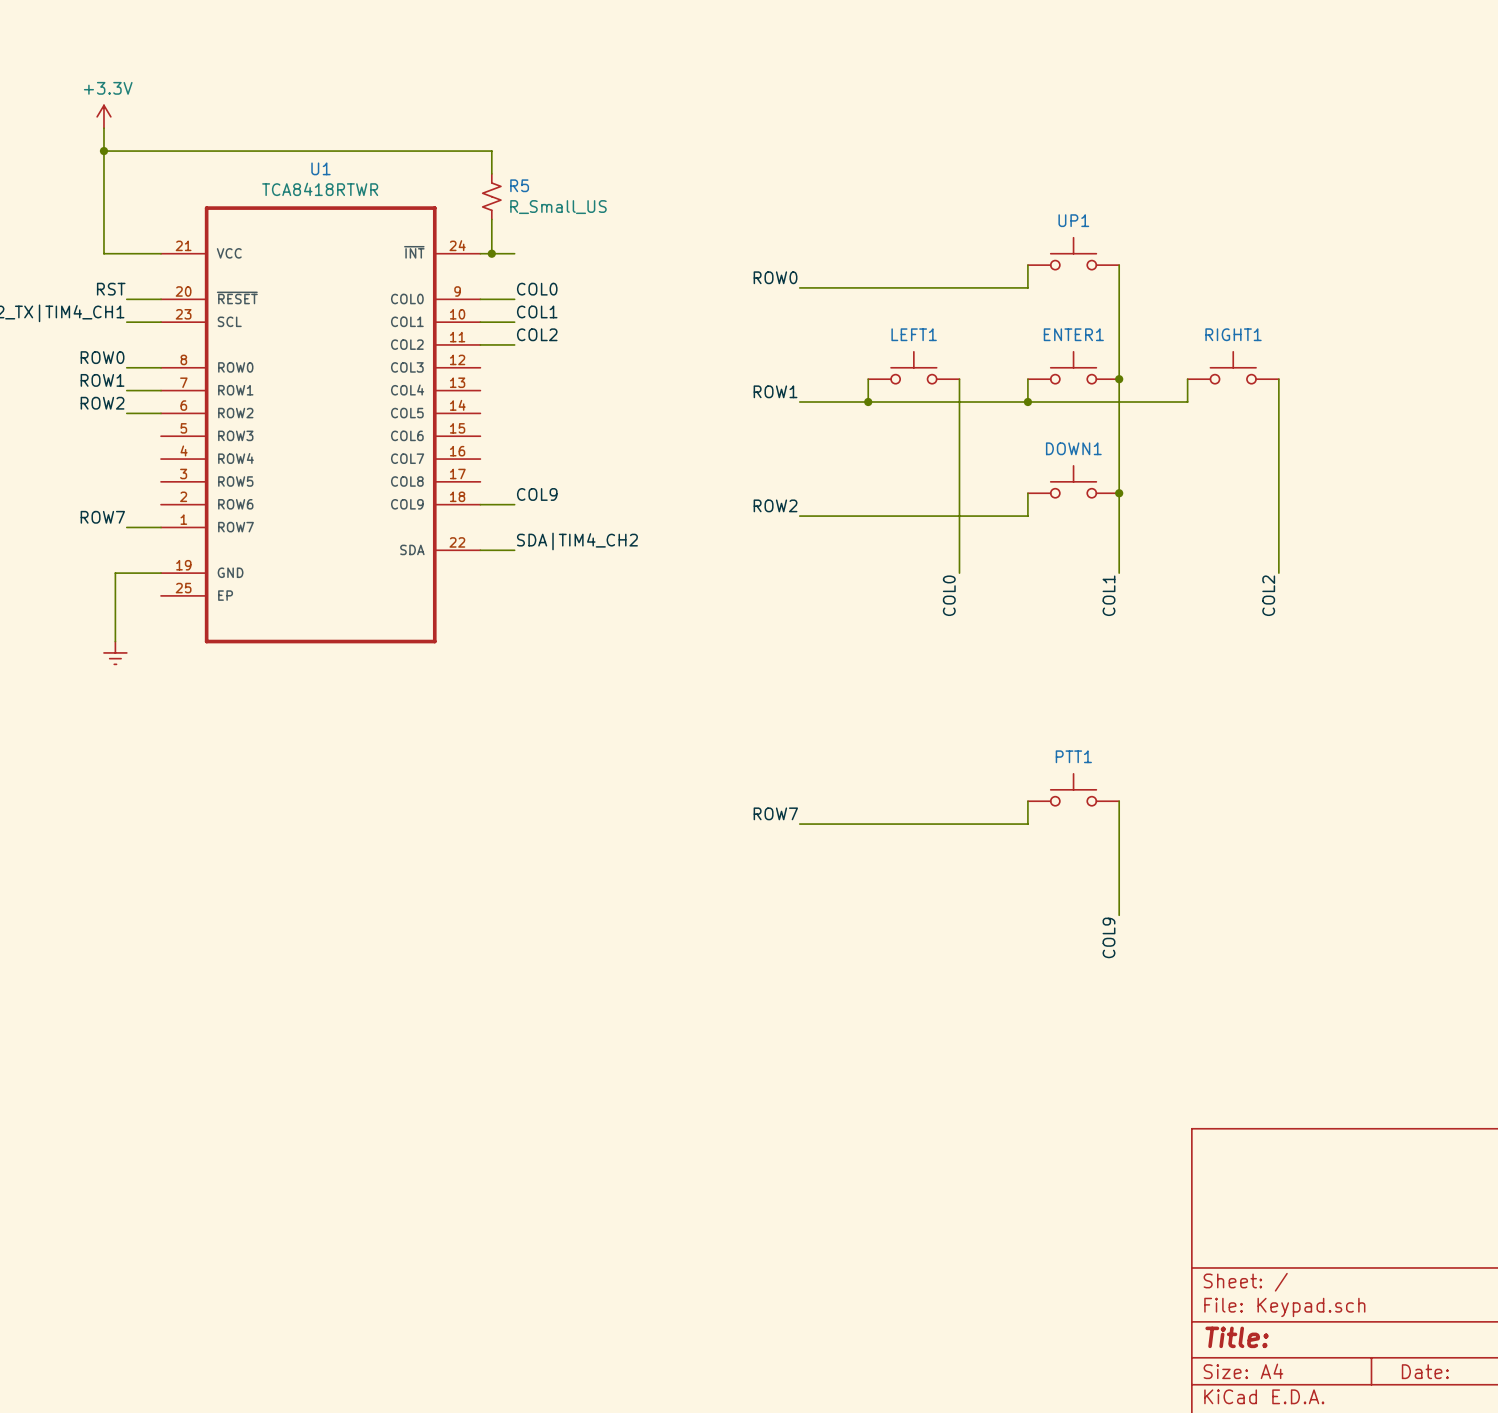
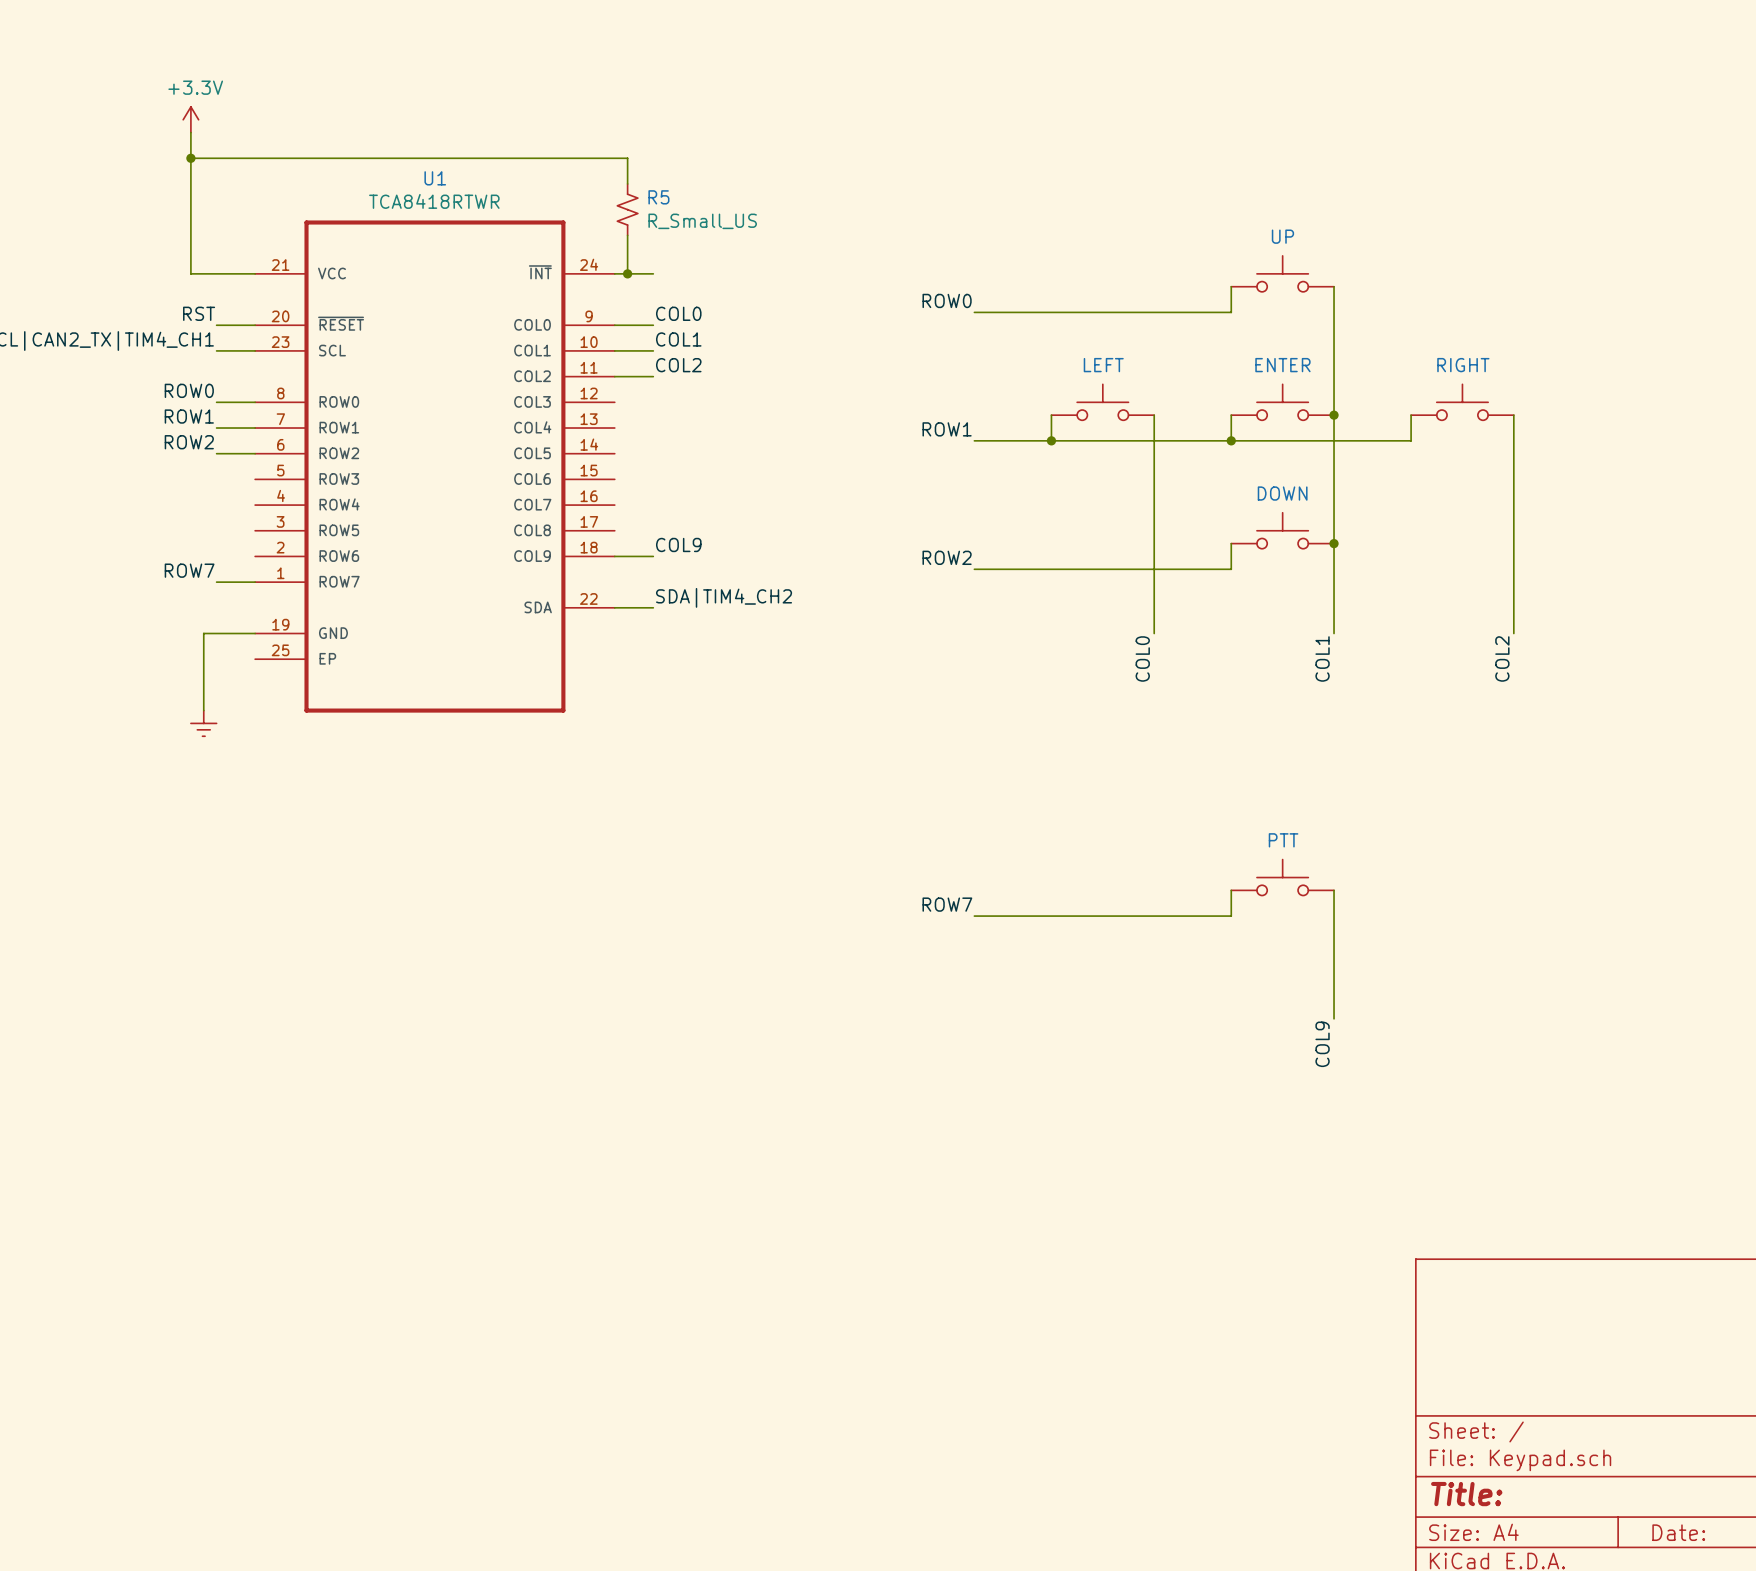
UP1 name: UP1 (1073, 220) -> UP (1282, 236)
LEFT1 name: LEFT1 (914, 334) -> LEFT (1103, 365)
ENTER1 name: ENTER1 (1073, 334) -> ENTER (1282, 365)
RIGHT1 name: RIGHT1 (1233, 334) -> RIGHT (1463, 365)
DOWN1 name: DOWN1 (1073, 448) -> DOWN (1282, 493)
PTT1 name: PTT1 (1073, 756) -> PTT (1283, 840)

